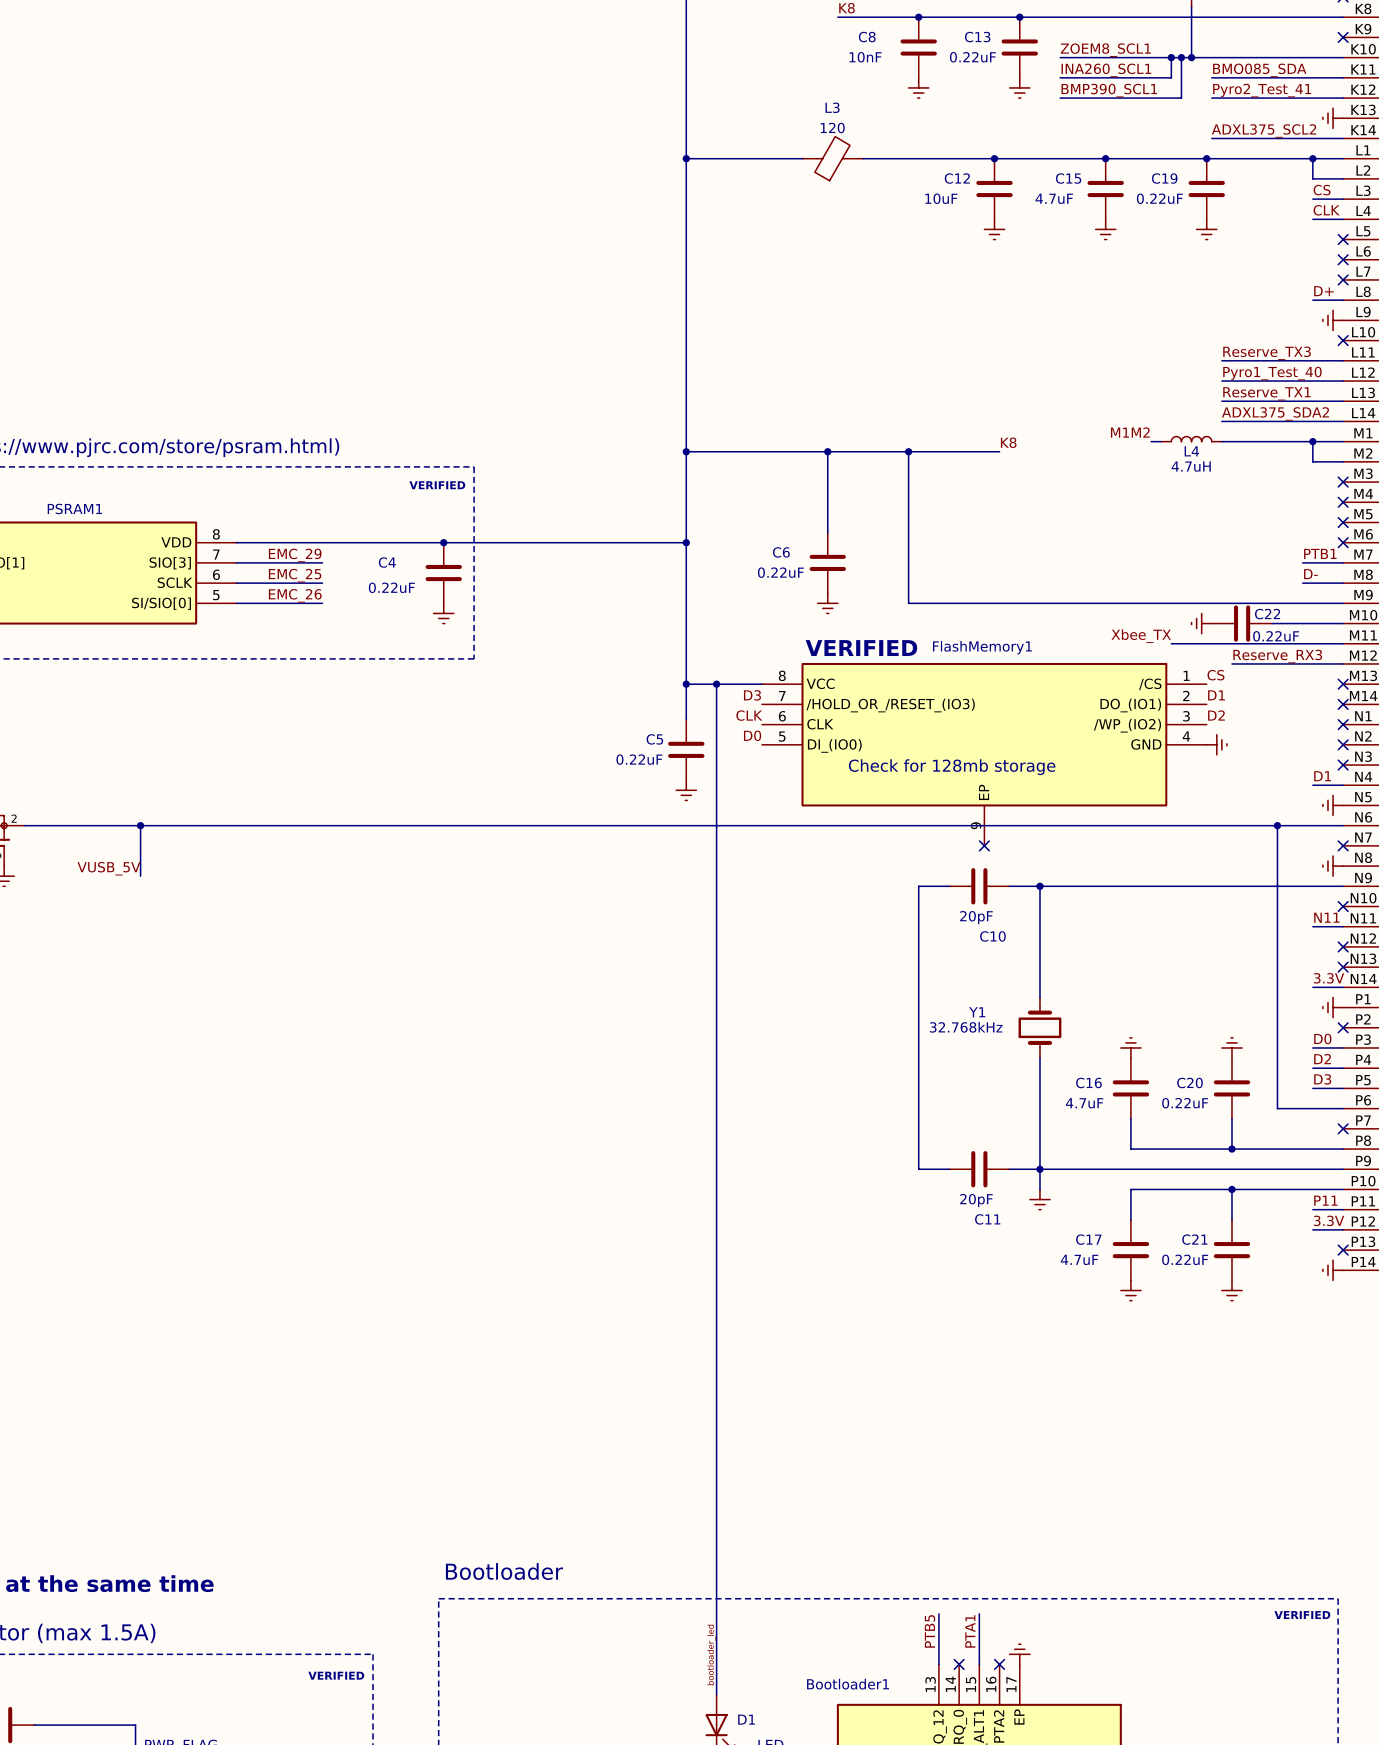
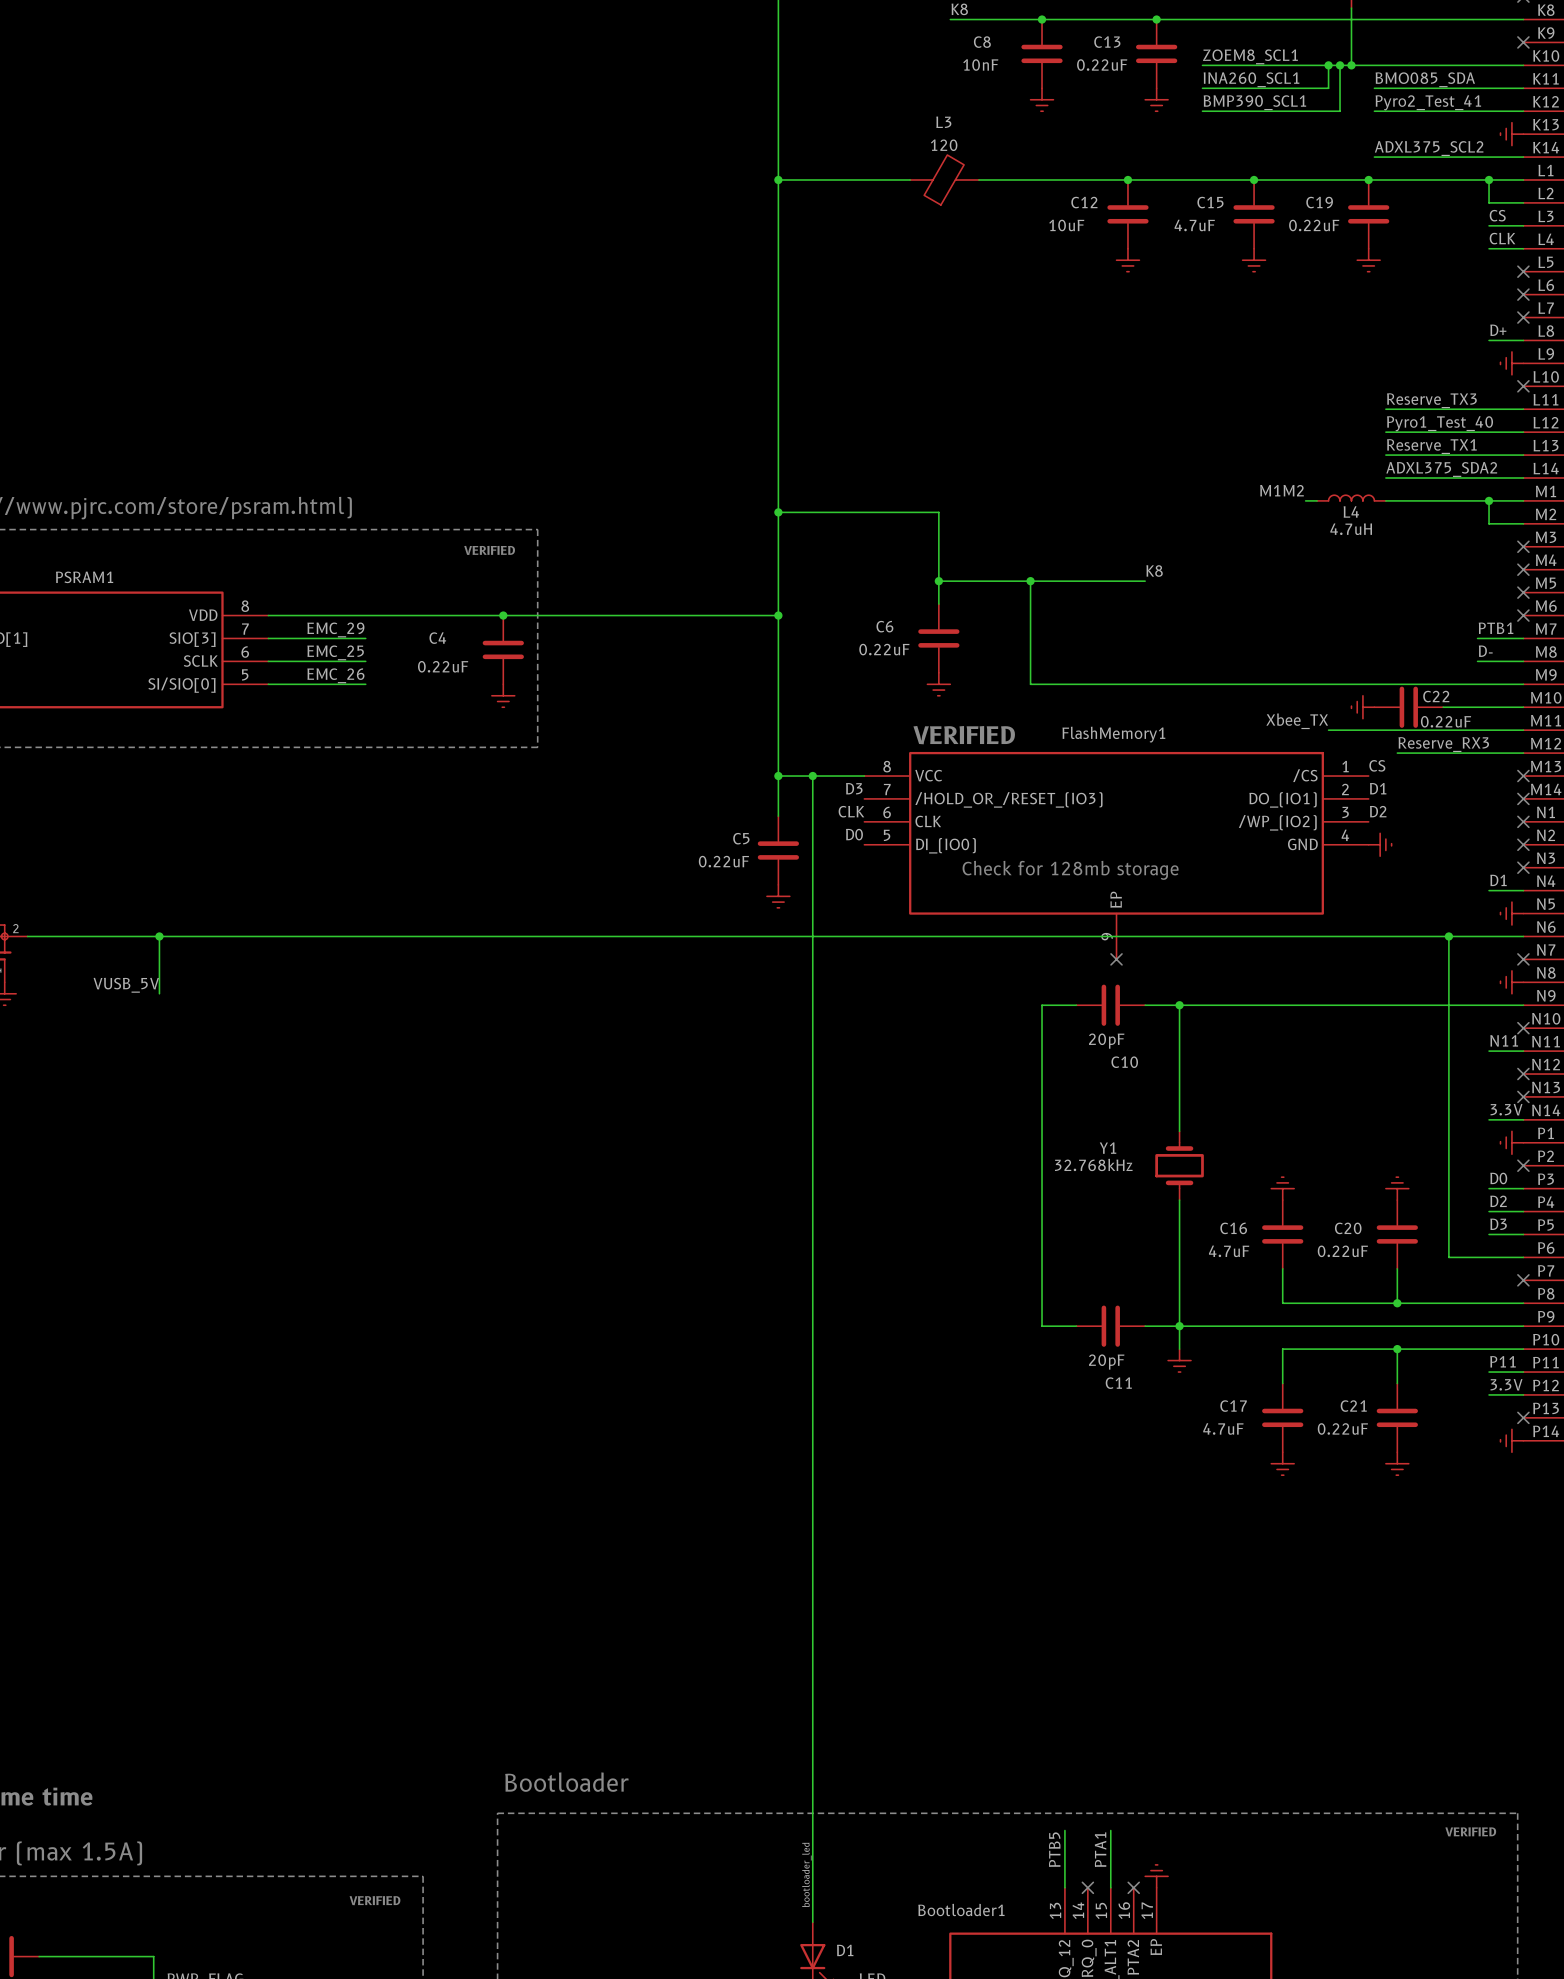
label position: K8 (1008, 442) -> K8 (1154, 570)
wire: (827, 451) (999, 451) -> none
junction: (827, 451) -> none
wire: (908, 451) (908, 512) -> none
junction: (908, 451) -> none
wire: none -> (938, 581) (1145, 581)
junction: none -> (938, 581)
junction: none -> (1030, 581)

